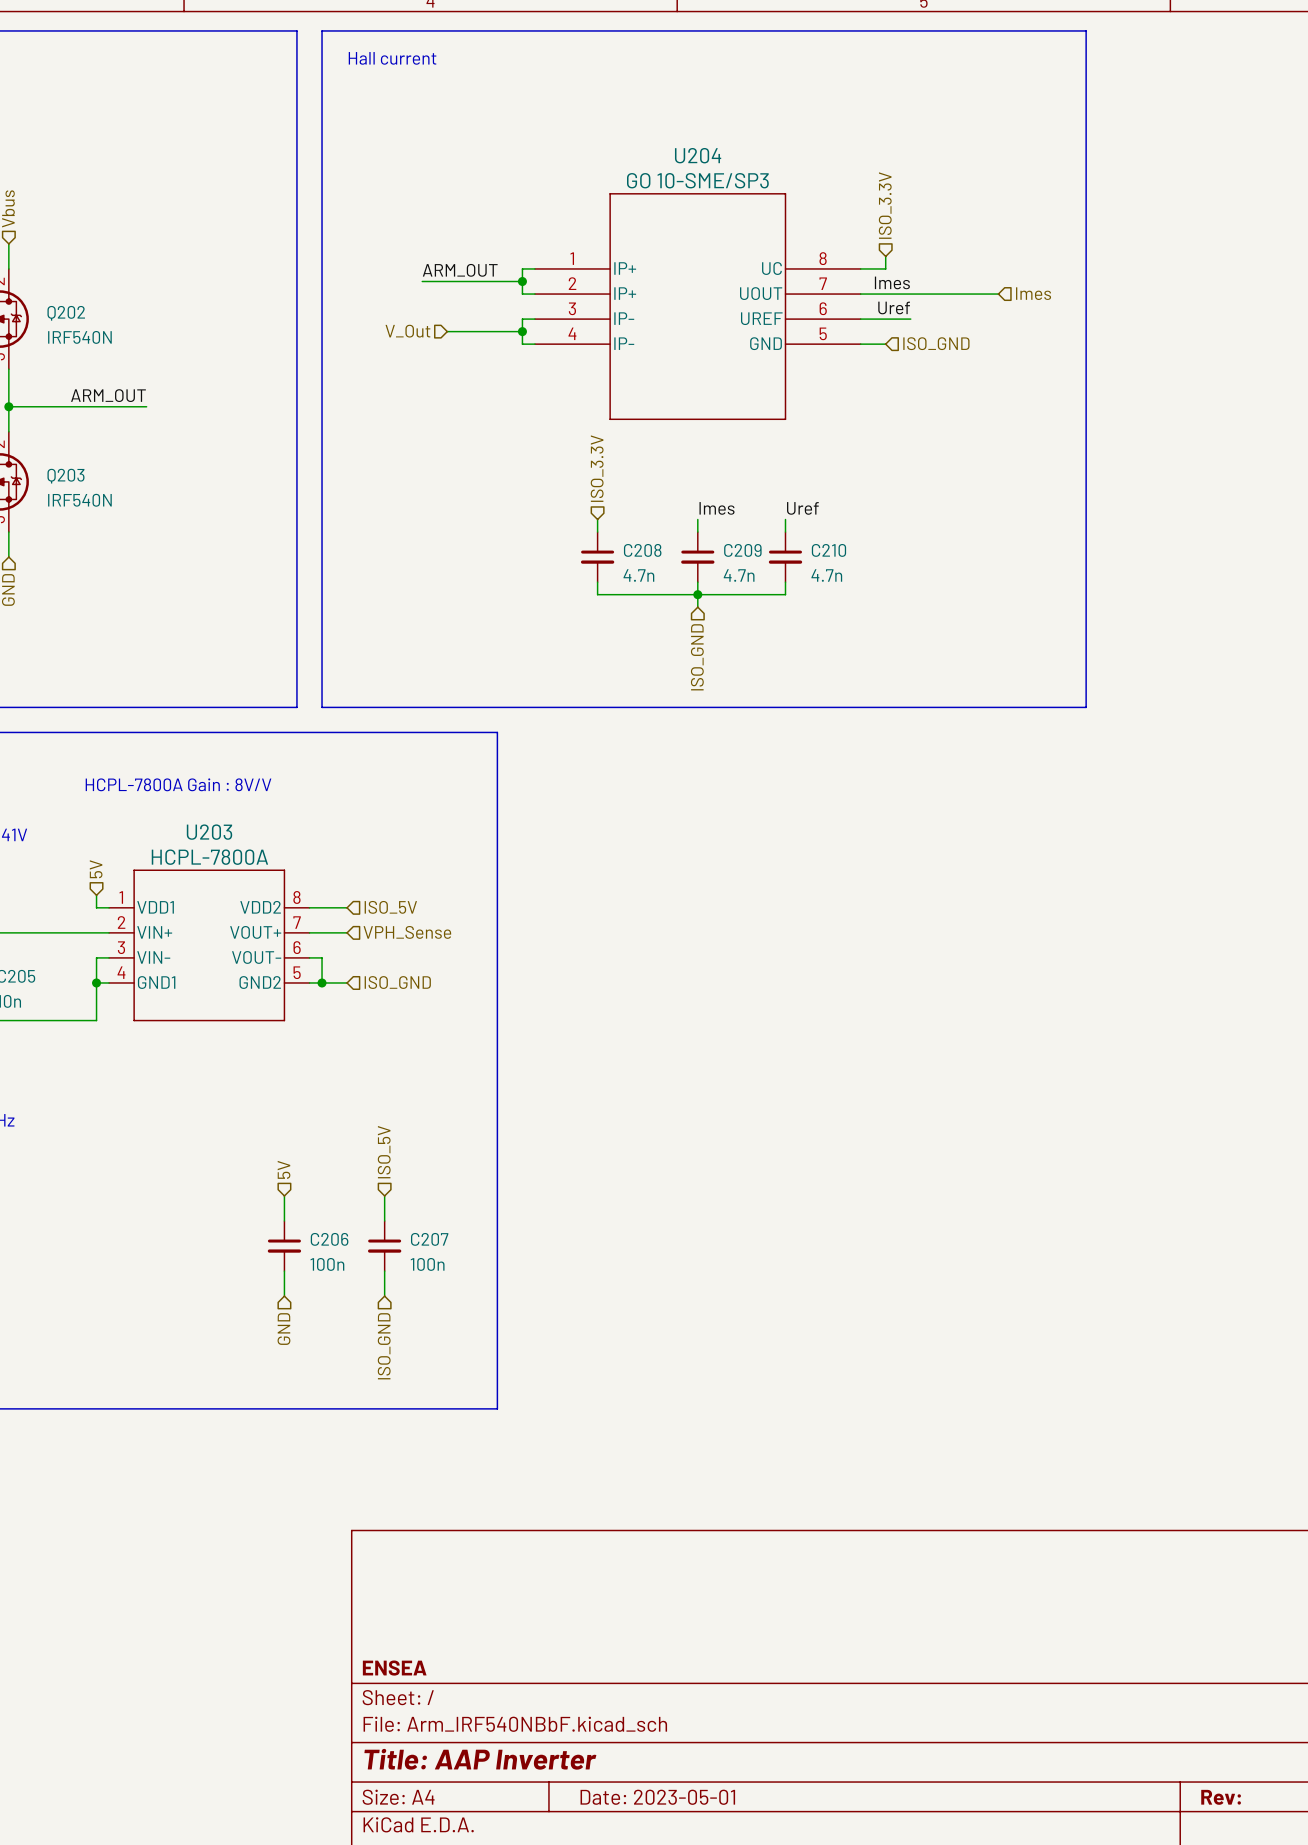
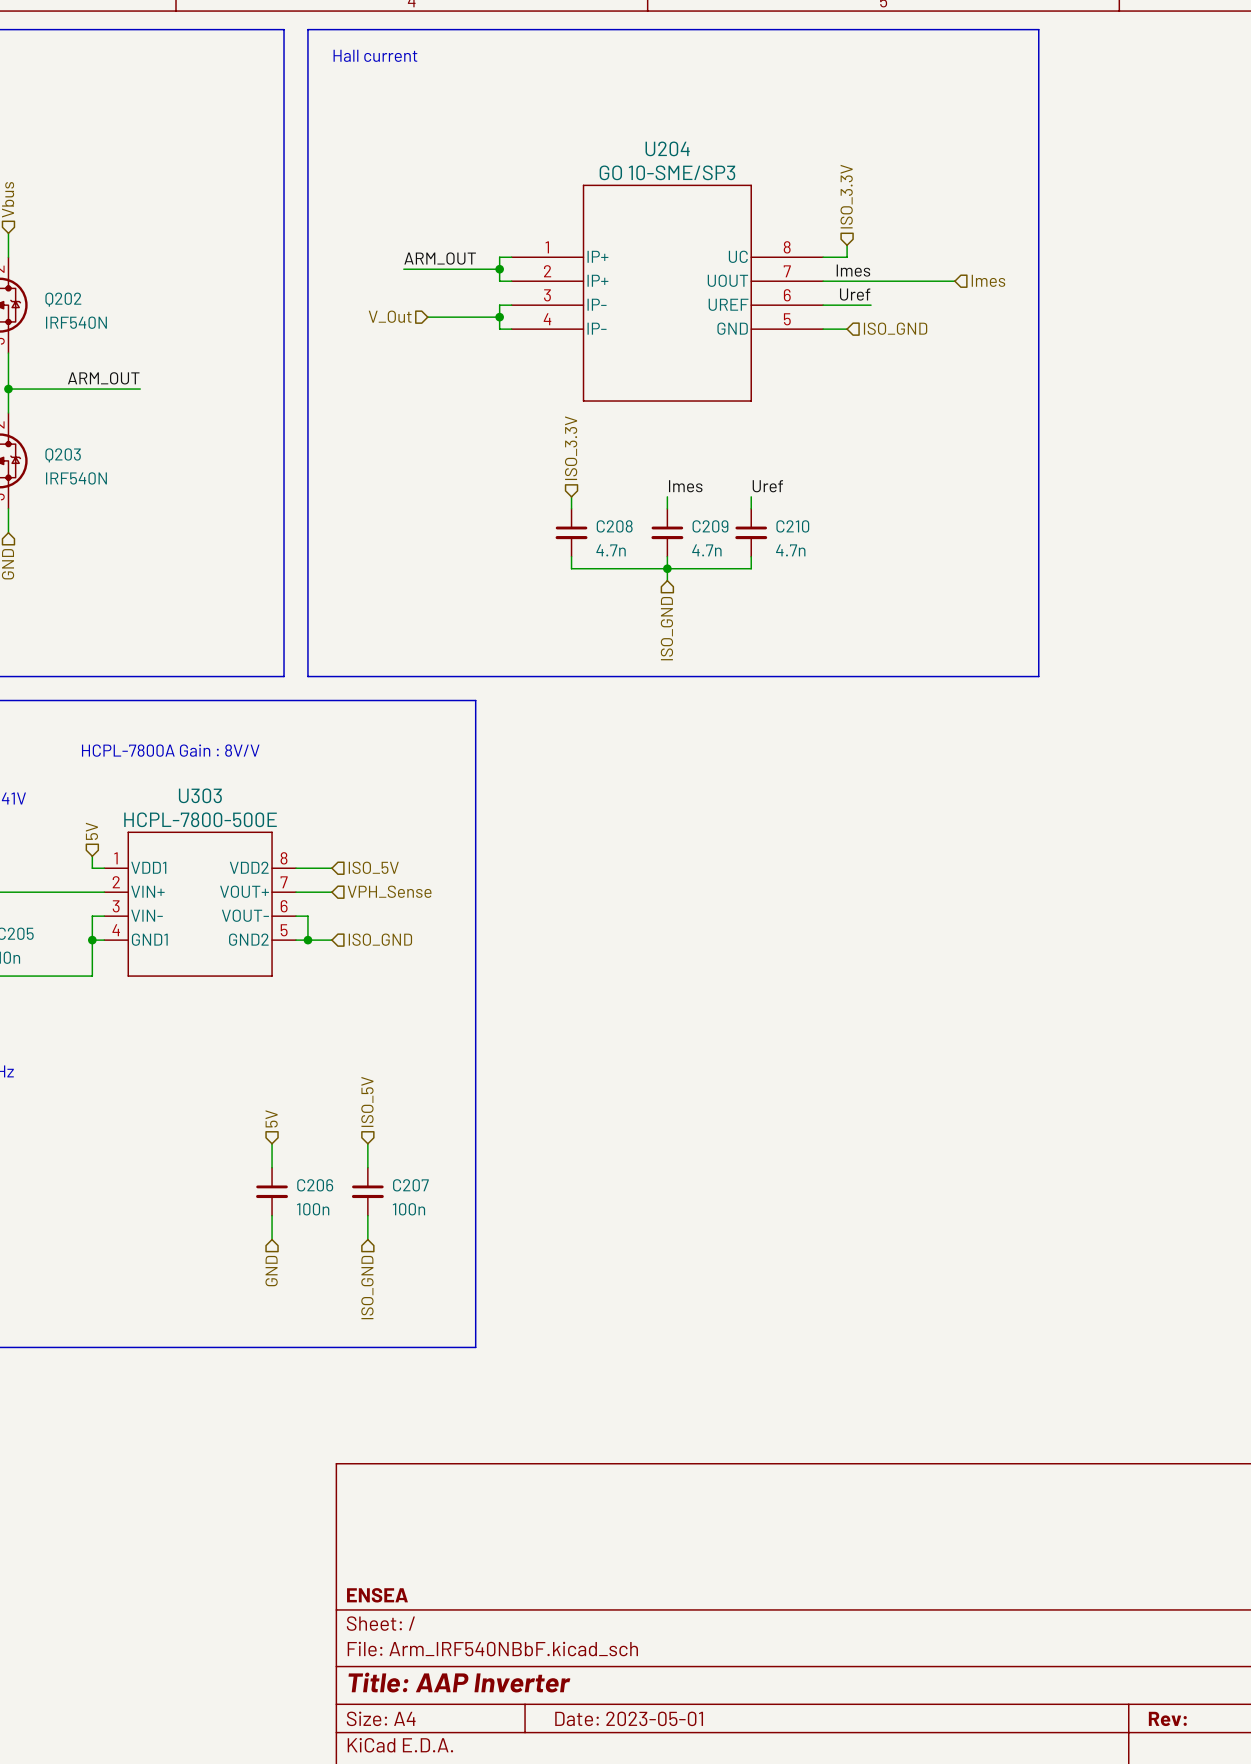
U203 name: U203 (209, 832) -> U303 (200, 795)
U203 value: HCPL-7800A (209, 857) -> HCPL-7800-500E (200, 819)

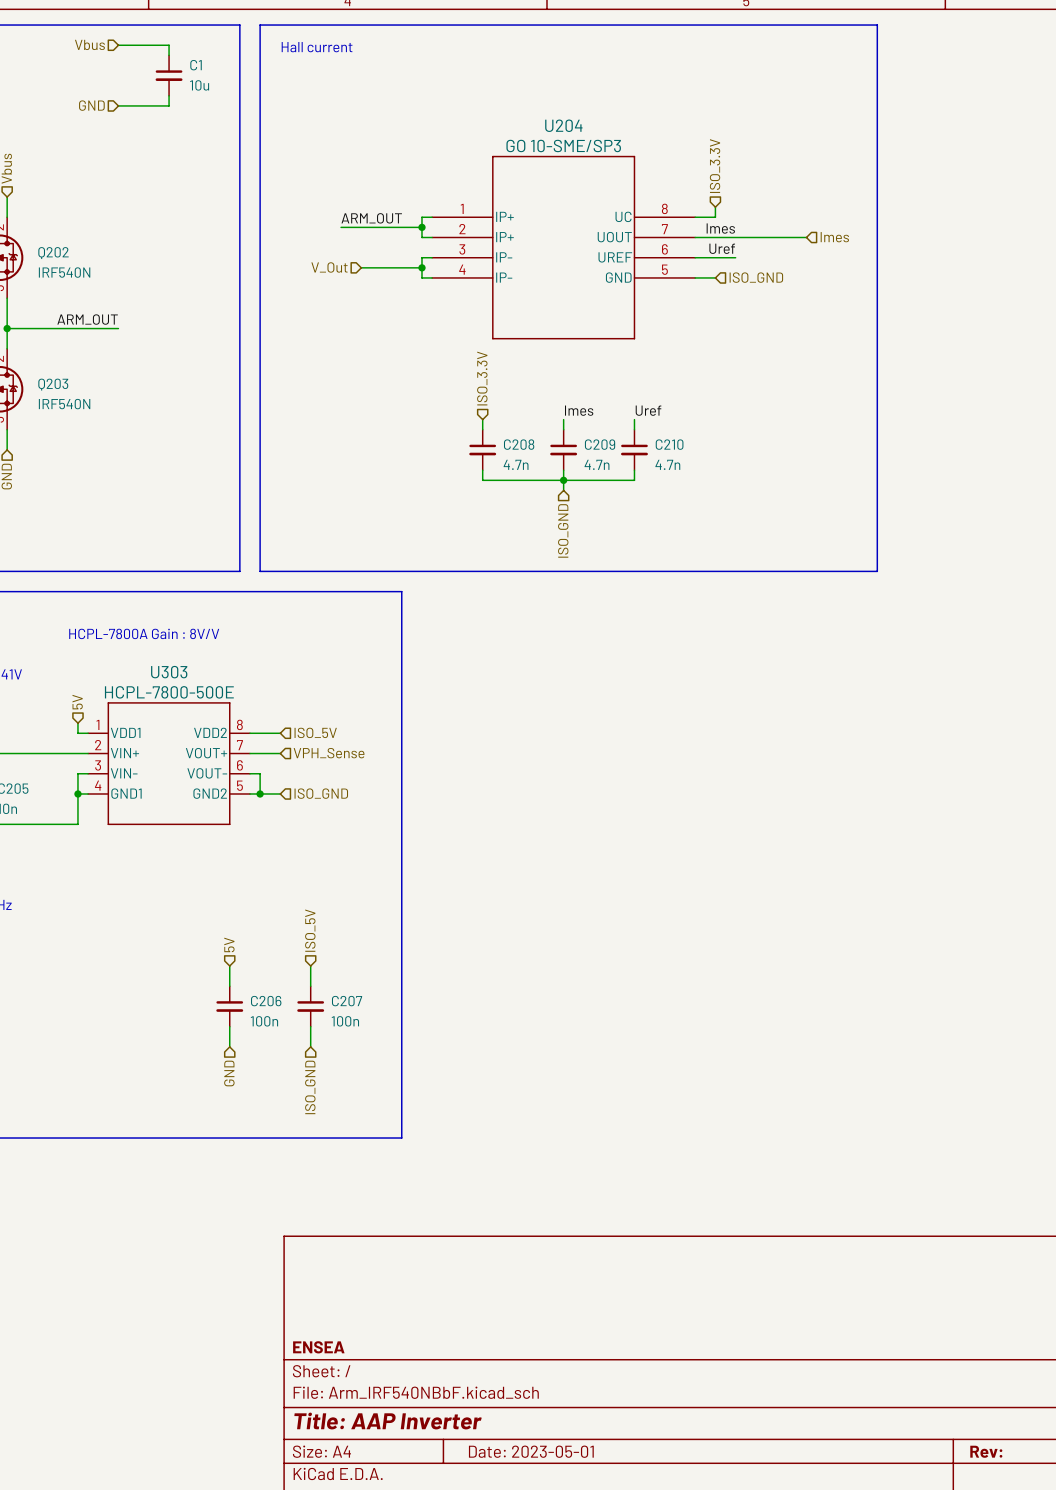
hierarchical label: none -> Vbus (89, 44)
wire: none -> (118, 45) (169, 45) (169, 55)
C1: none -> 10u (169, 75)
wire: none -> (169, 95) (169, 105) (118, 105)
hierarchical label: none -> GND (91, 105)

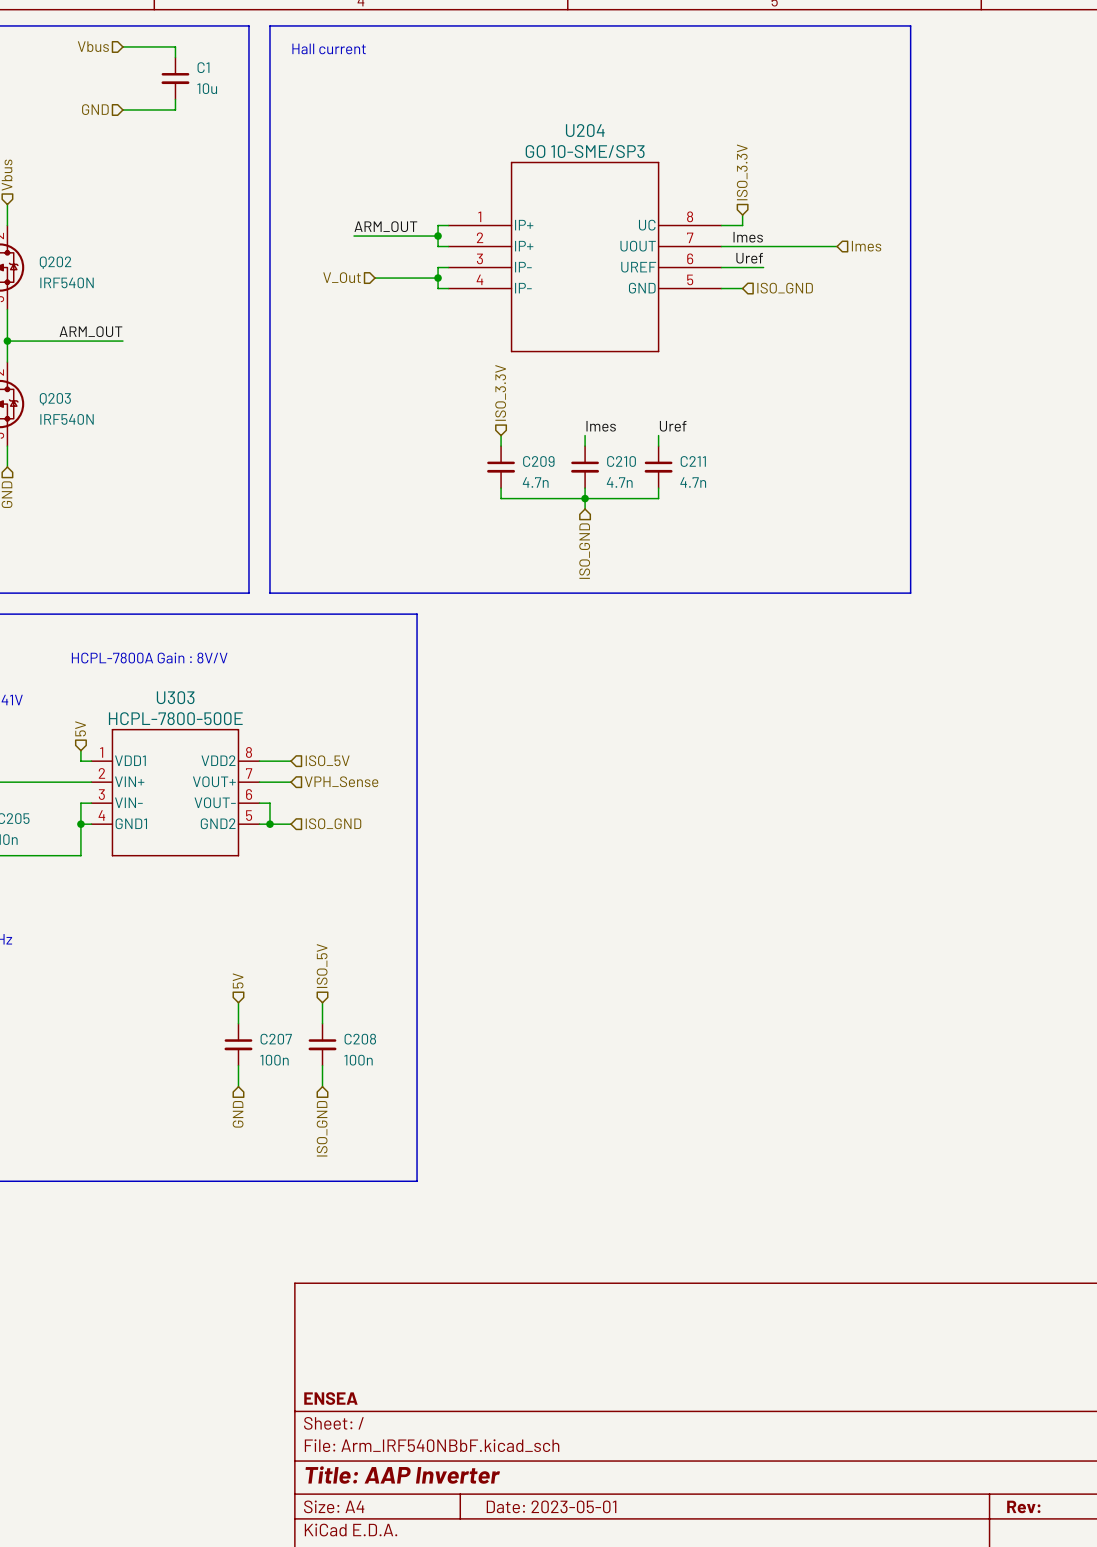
C208 name: C208 (519, 444) -> C209 (538, 461)
C209 name: C209 (600, 444) -> C210 (621, 461)
C210 name: C210 (669, 444) -> C211 (693, 461)
C206 name: C206 (266, 1001) -> C207 (276, 1039)
C207 name: C207 (347, 1001) -> C208 (360, 1039)

